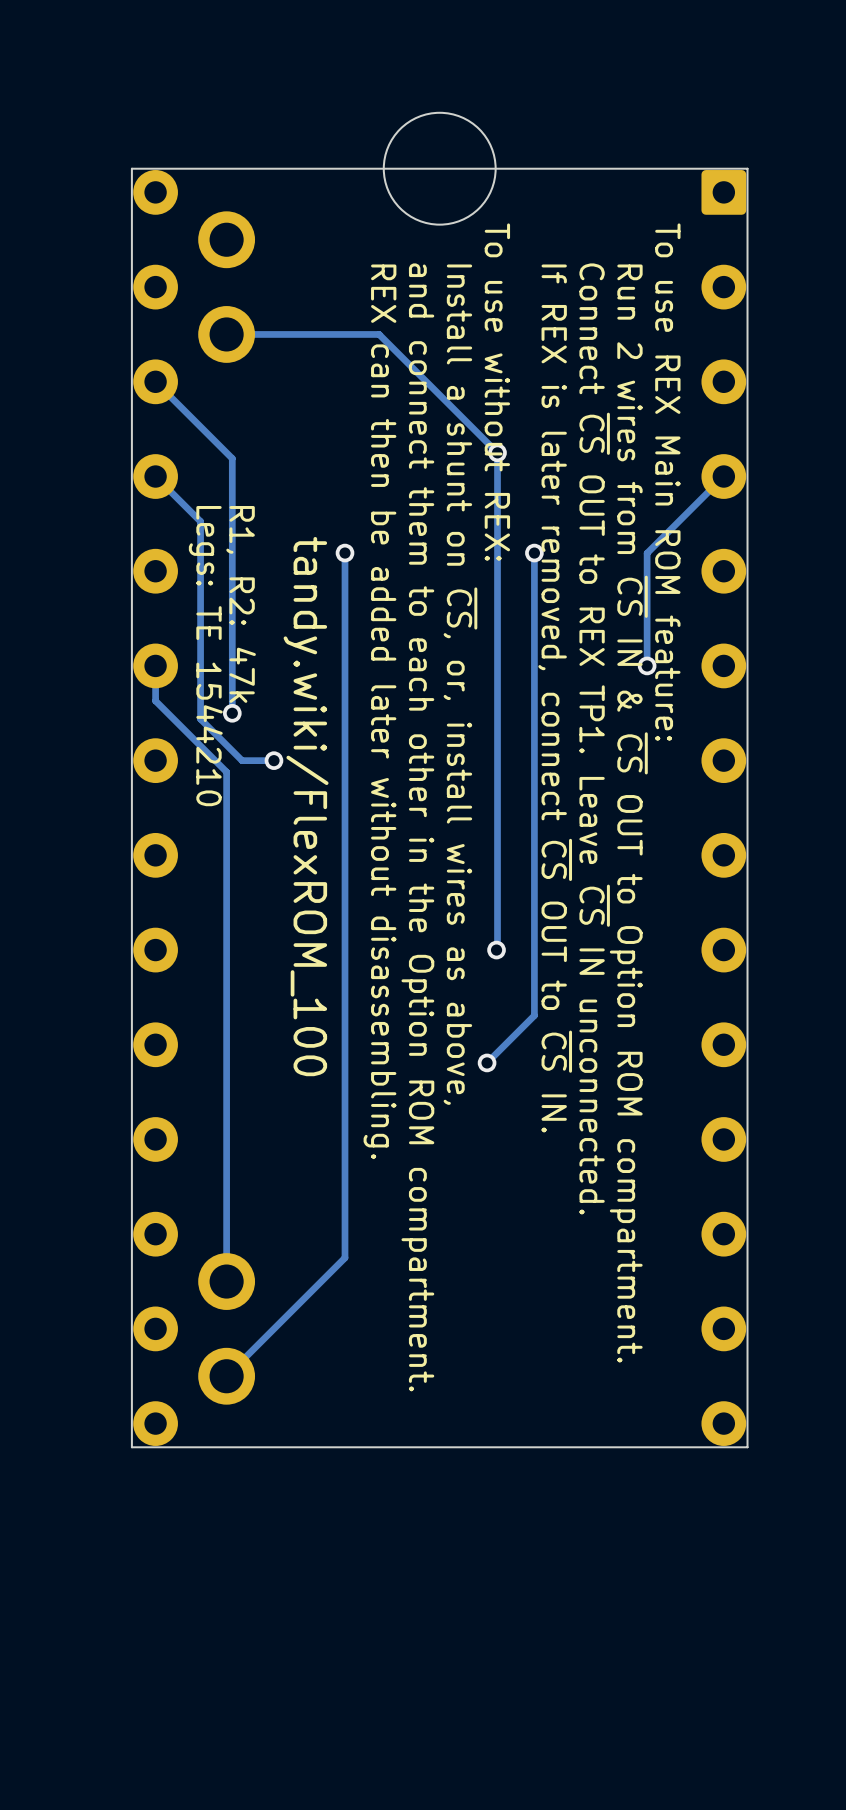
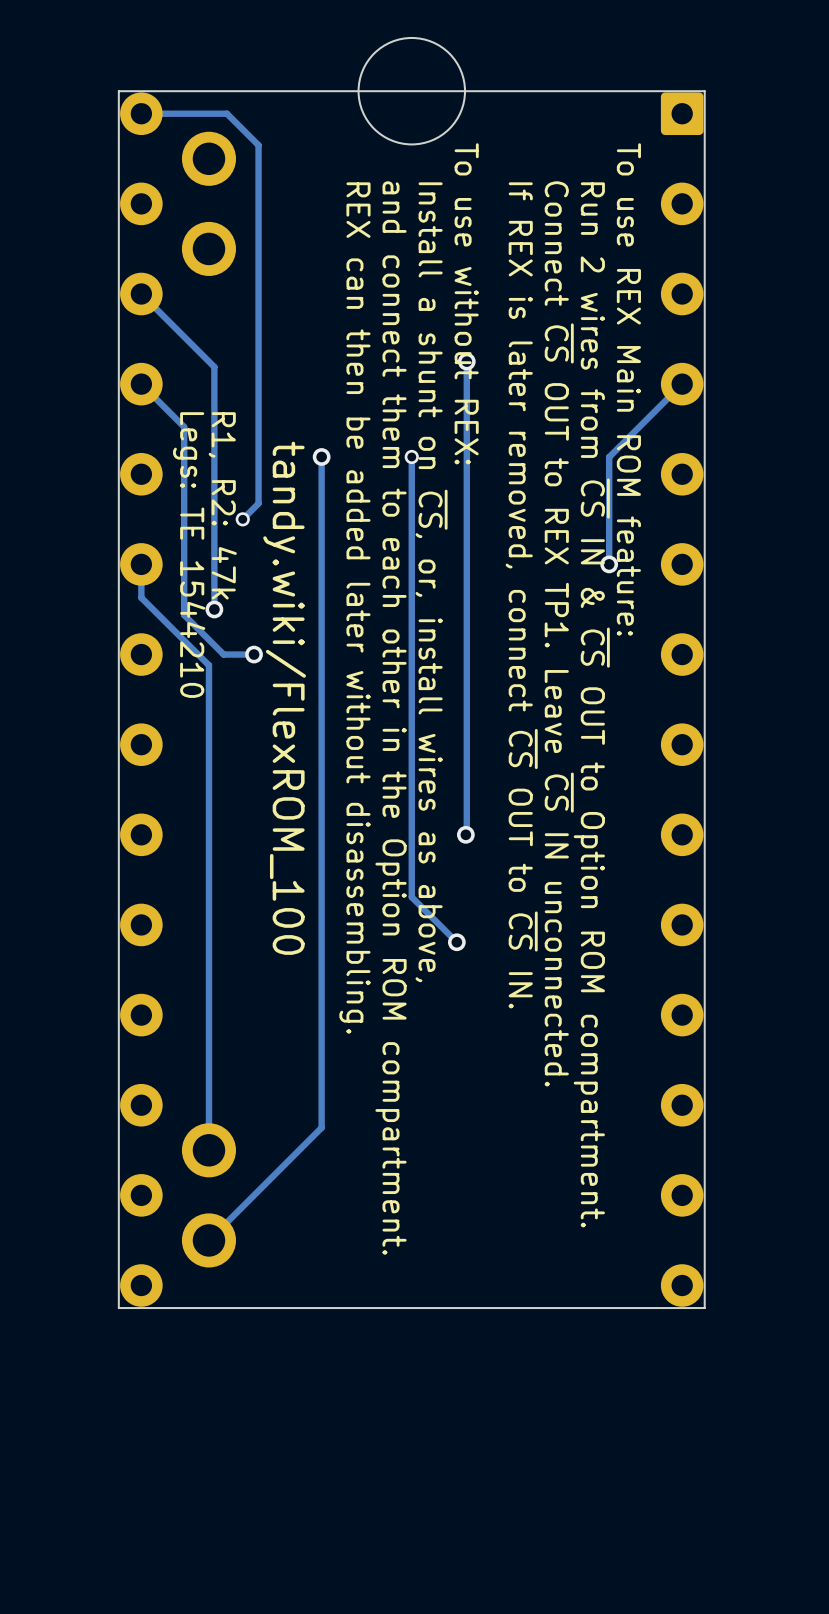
track: none -> (141, 113) (227, 113) (258, 145) (258, 503) (242, 519)
track: (226, 334) (379, 334) (497, 452) -> none
via: none -> (411, 456)
track: (534, 553) (534, 1015) (487, 1062) -> (411, 456) (411, 897) (456, 942)
via: (534, 553) -> none
via: none -> (242, 519)

